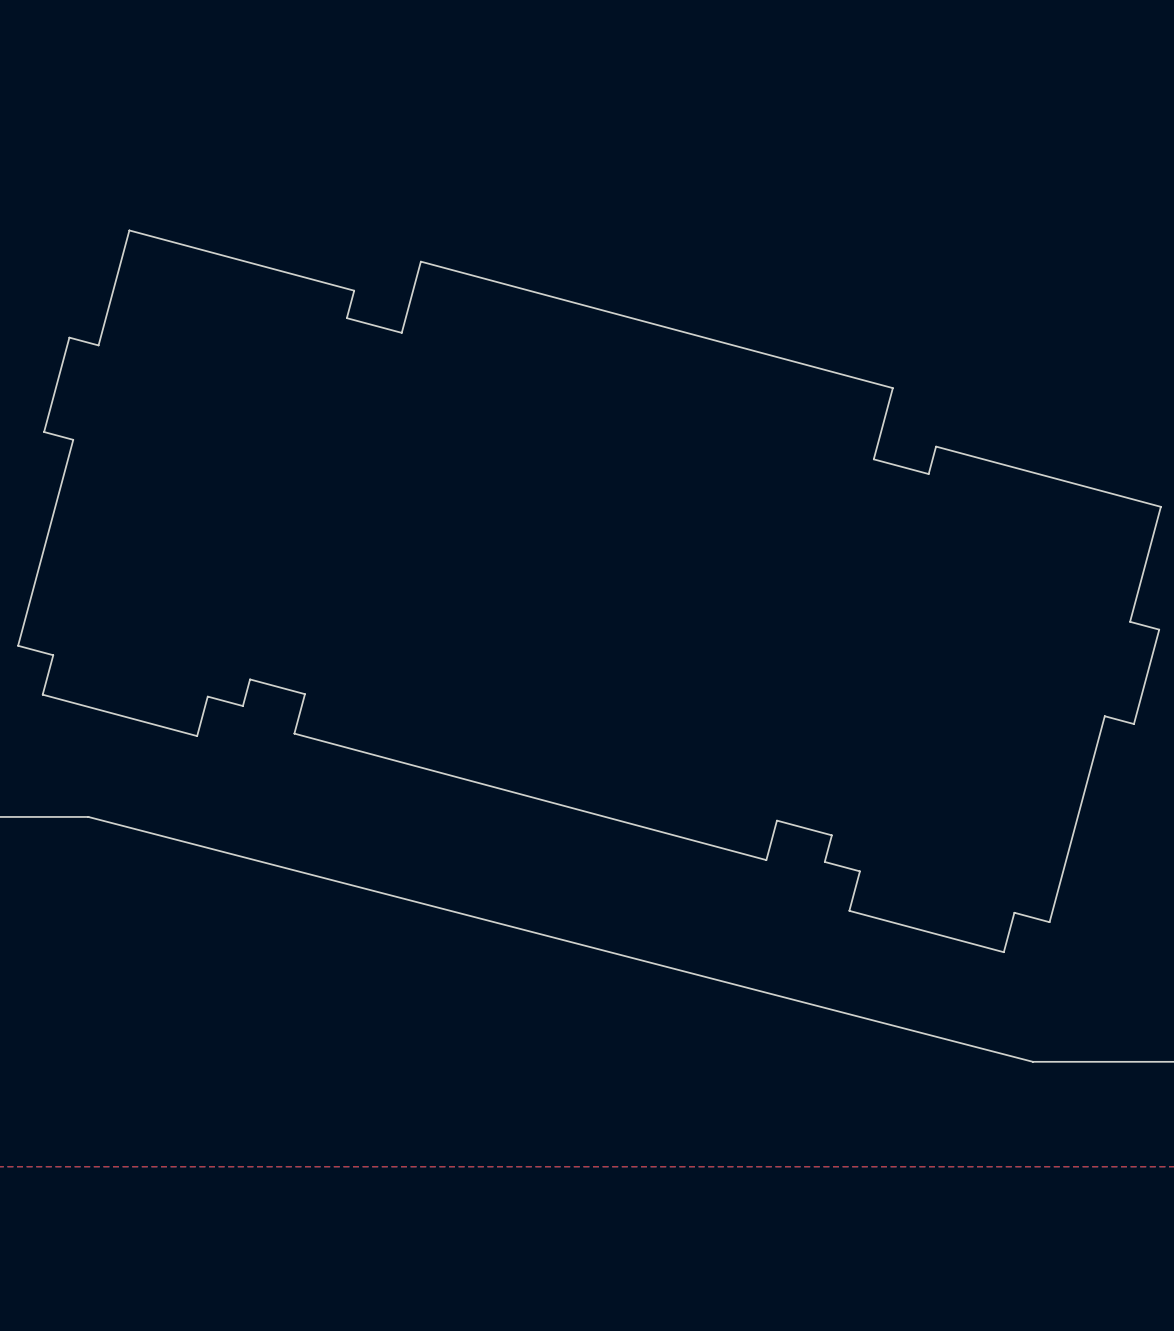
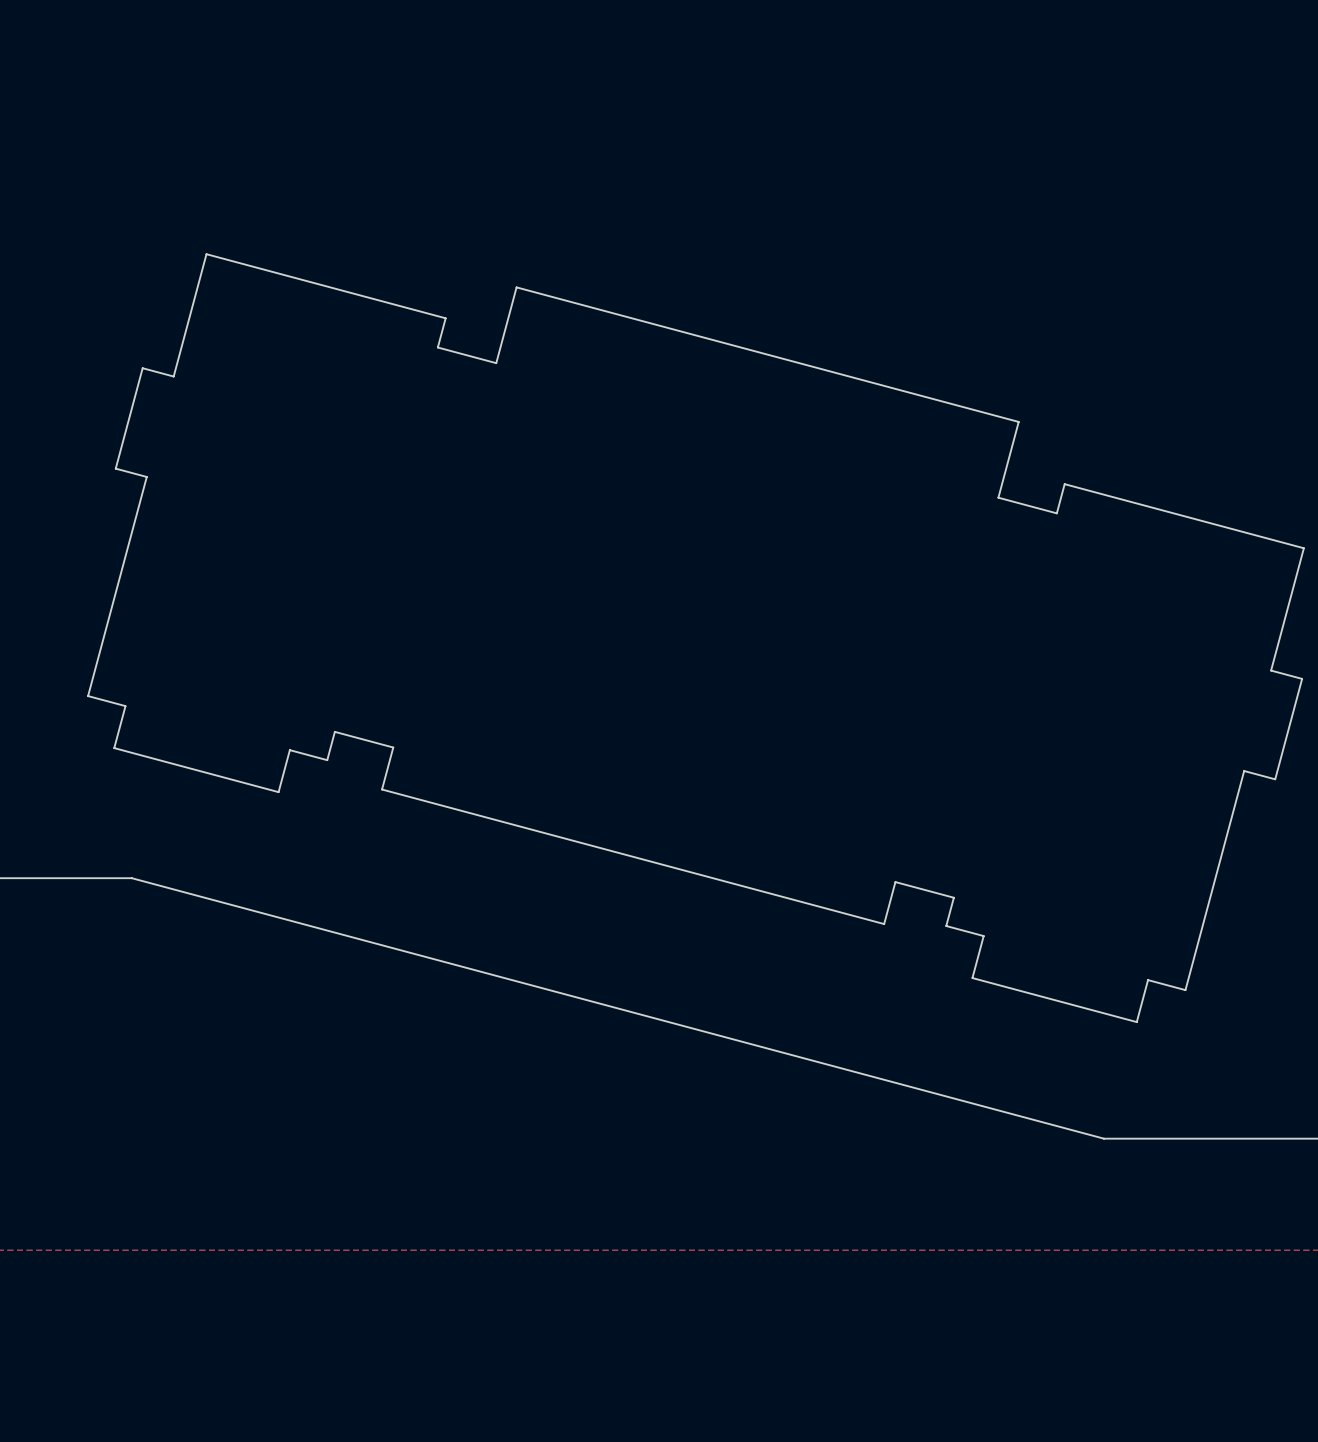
board edge: (59, 816) (88, 816) (1032, 1061) -> (131, 878) (1103, 1138) (1167, 1138)

